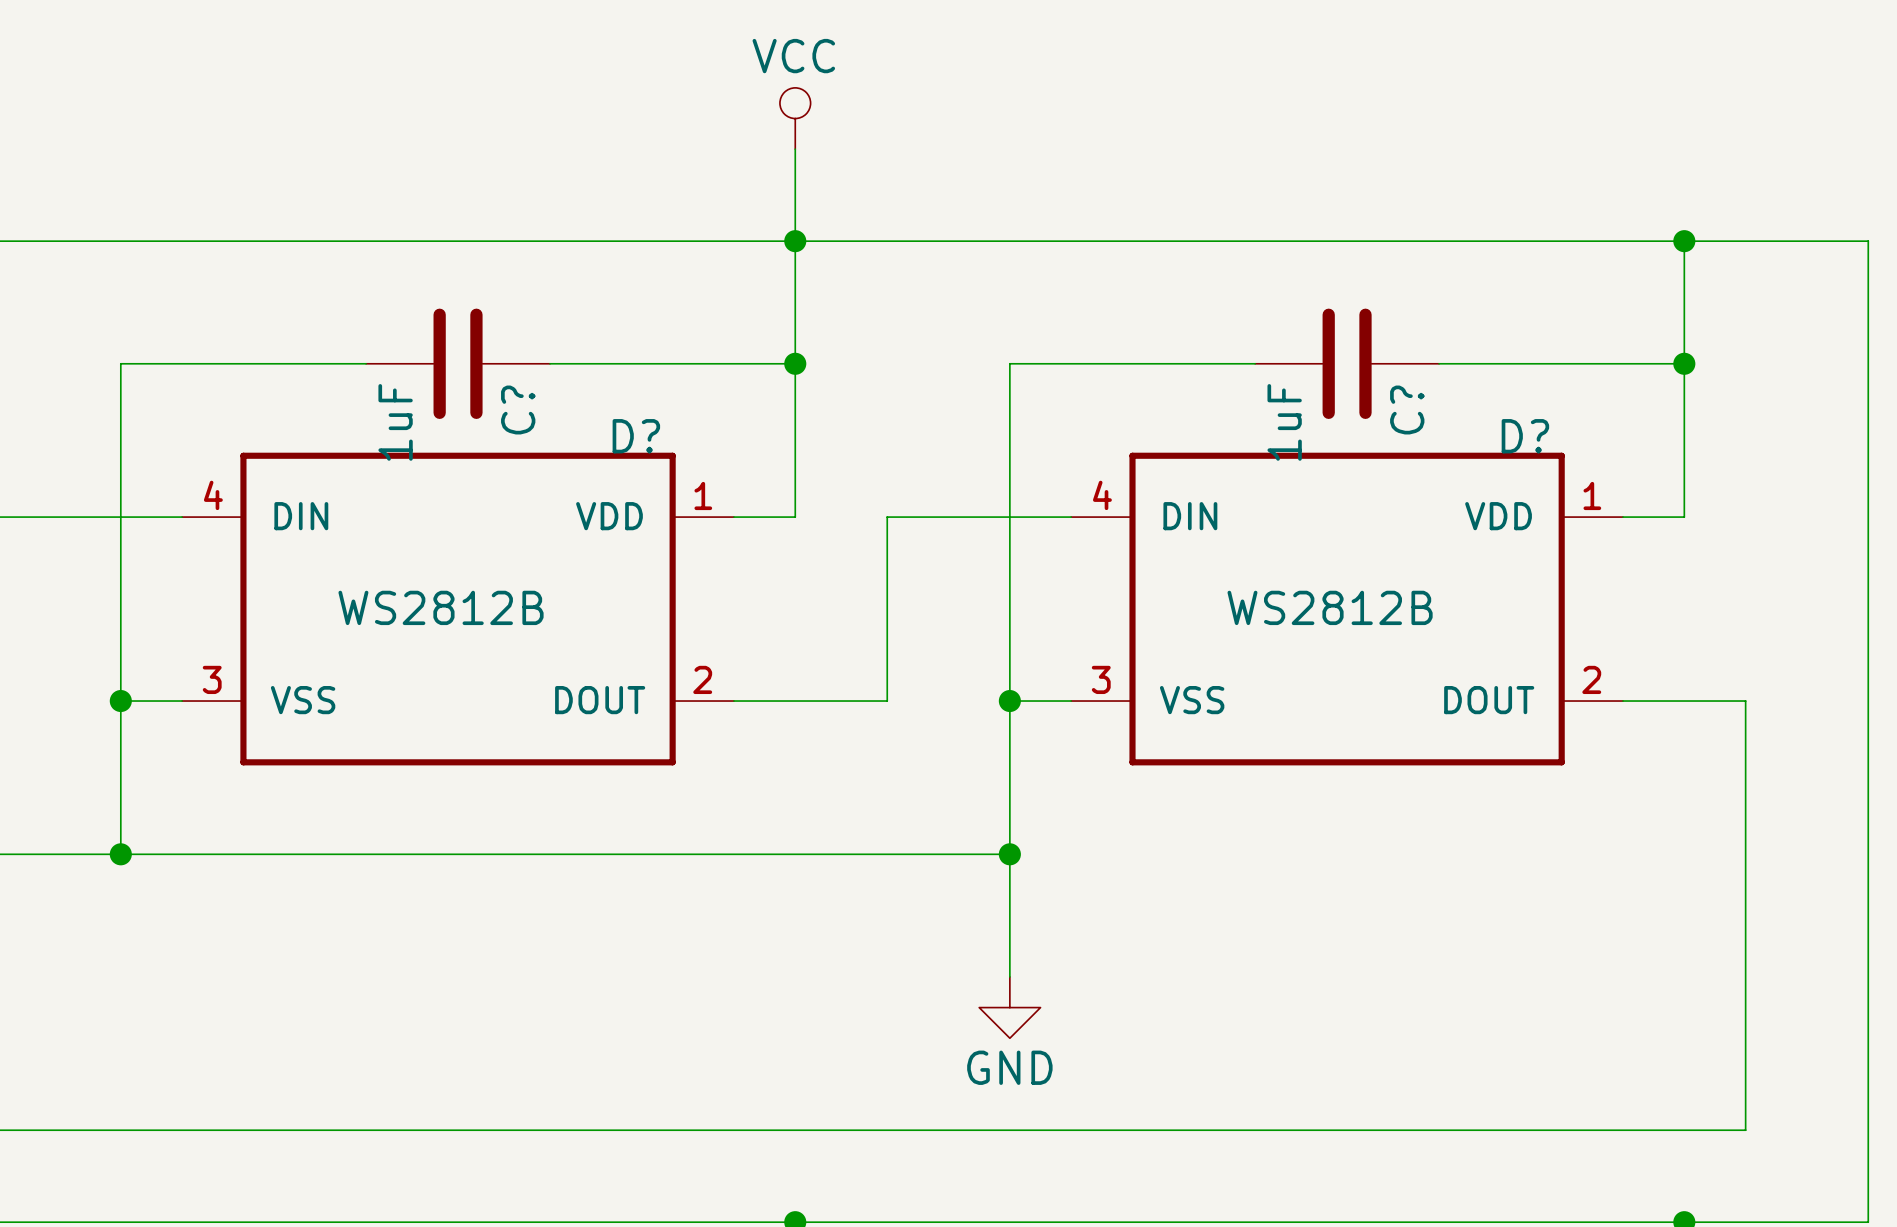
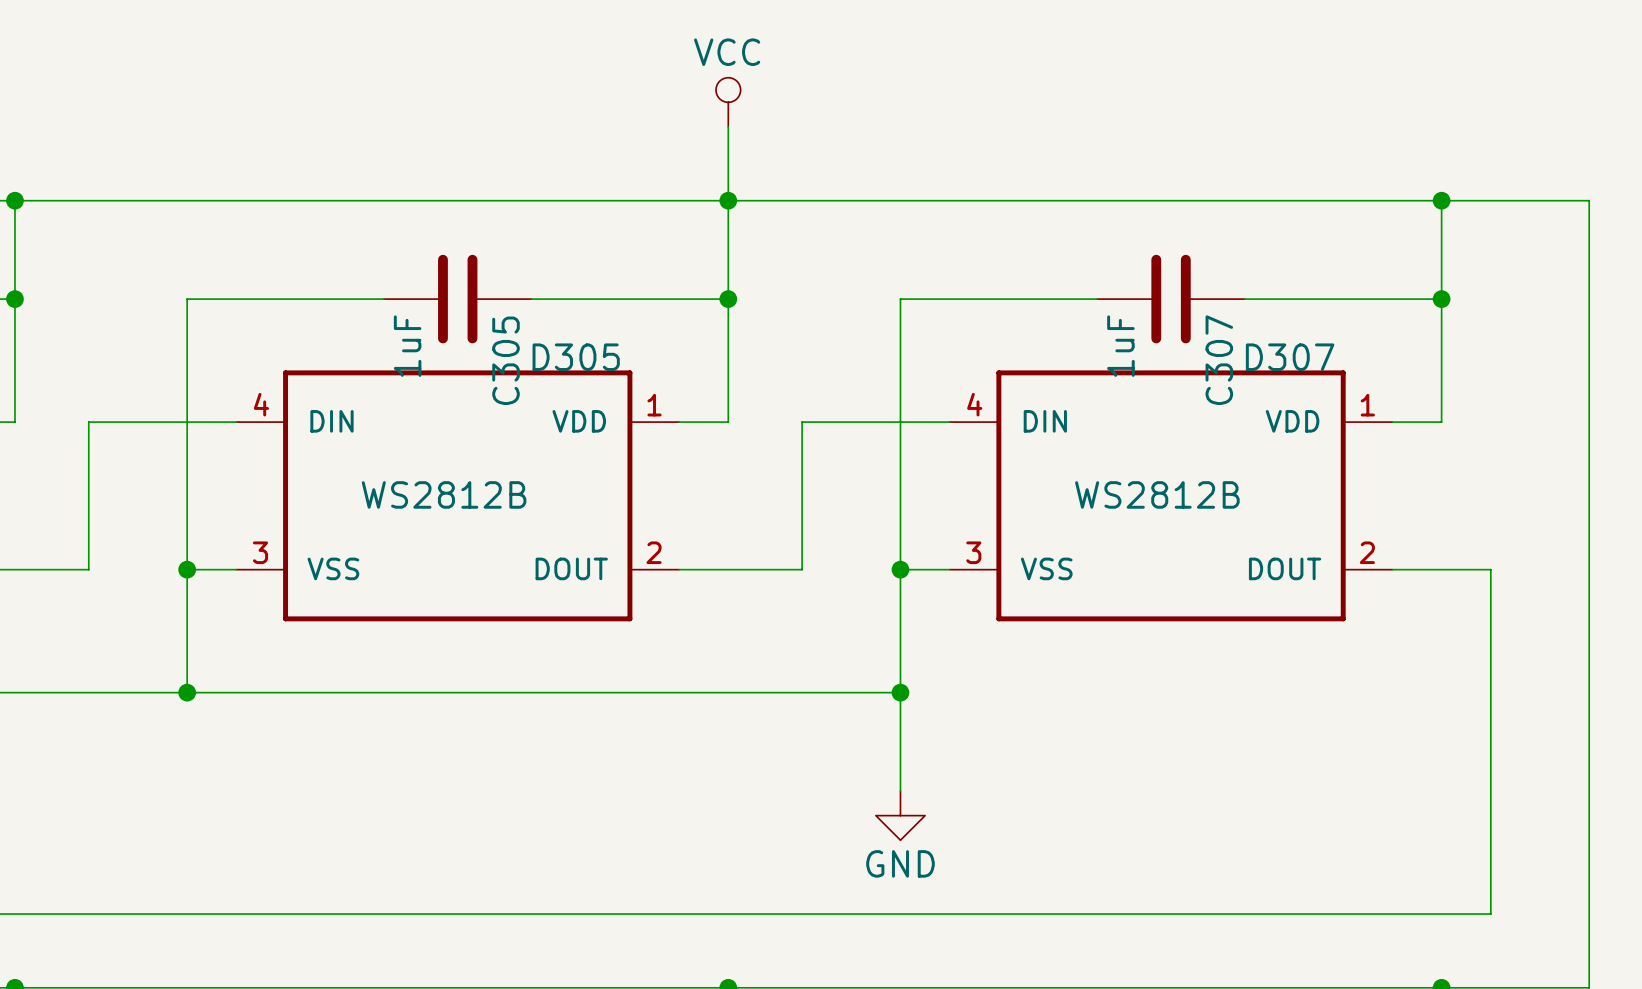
C? name: C? (518, 410) -> C305 (506, 360)
C? name: C? (1407, 410) -> C307 (1219, 360)
D? name: D? (636, 436) -> D305 (576, 357)
D? name: D? (1525, 436) -> D307 (1290, 357)

